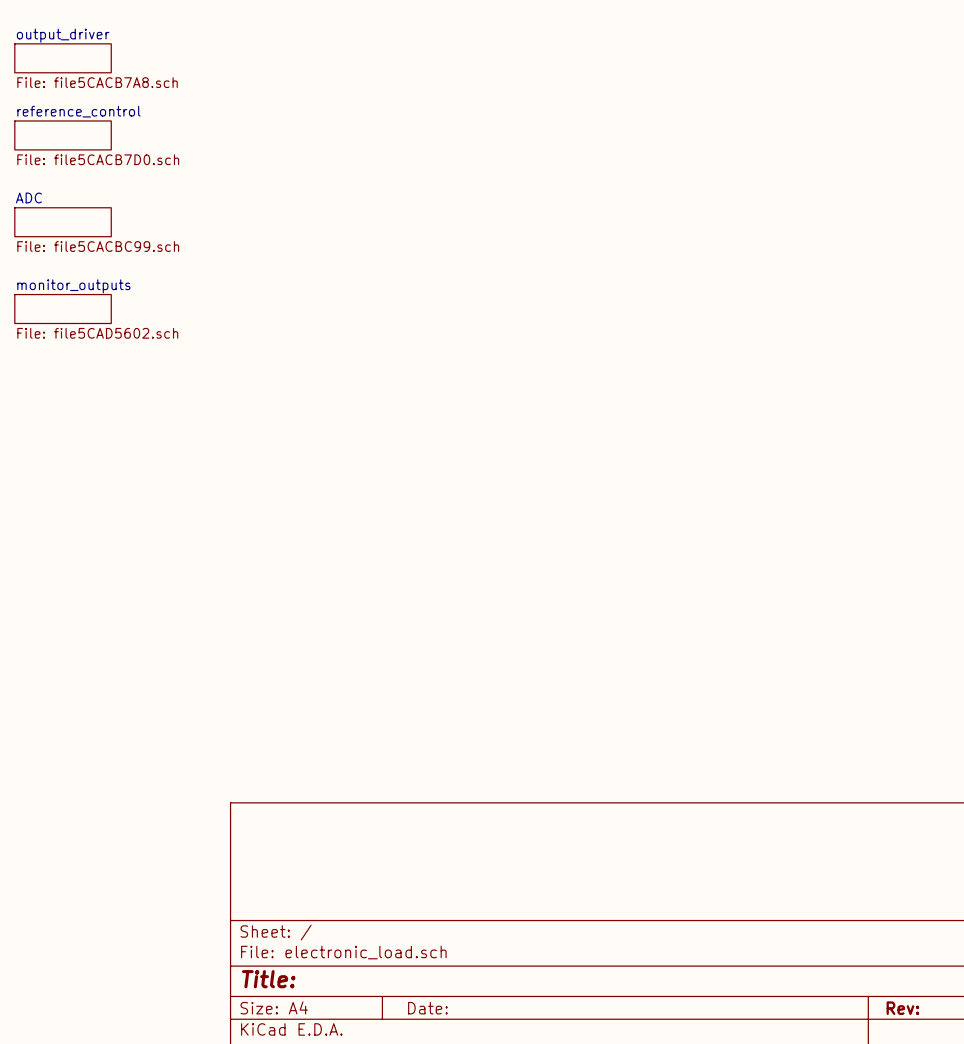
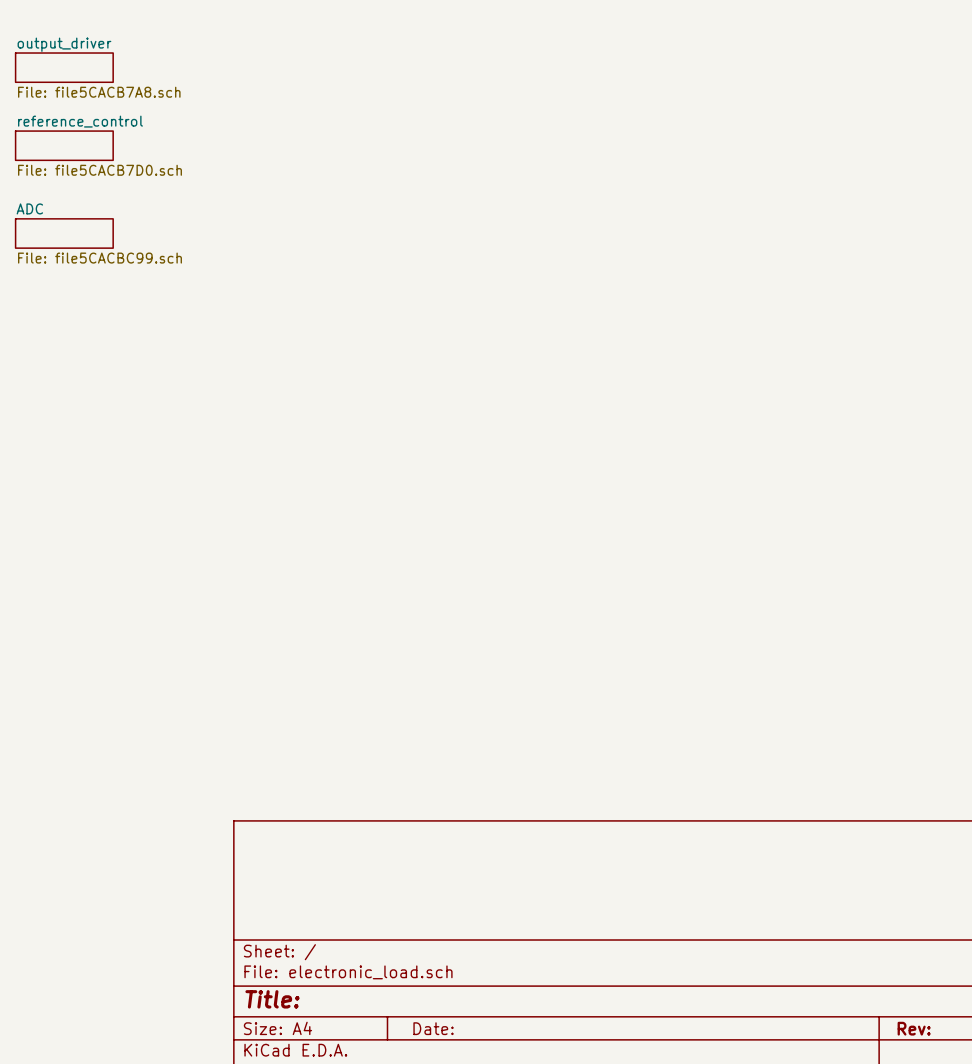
sheet monitor_outputs: File: file5CAD5602.sch (63, 309) -> none

